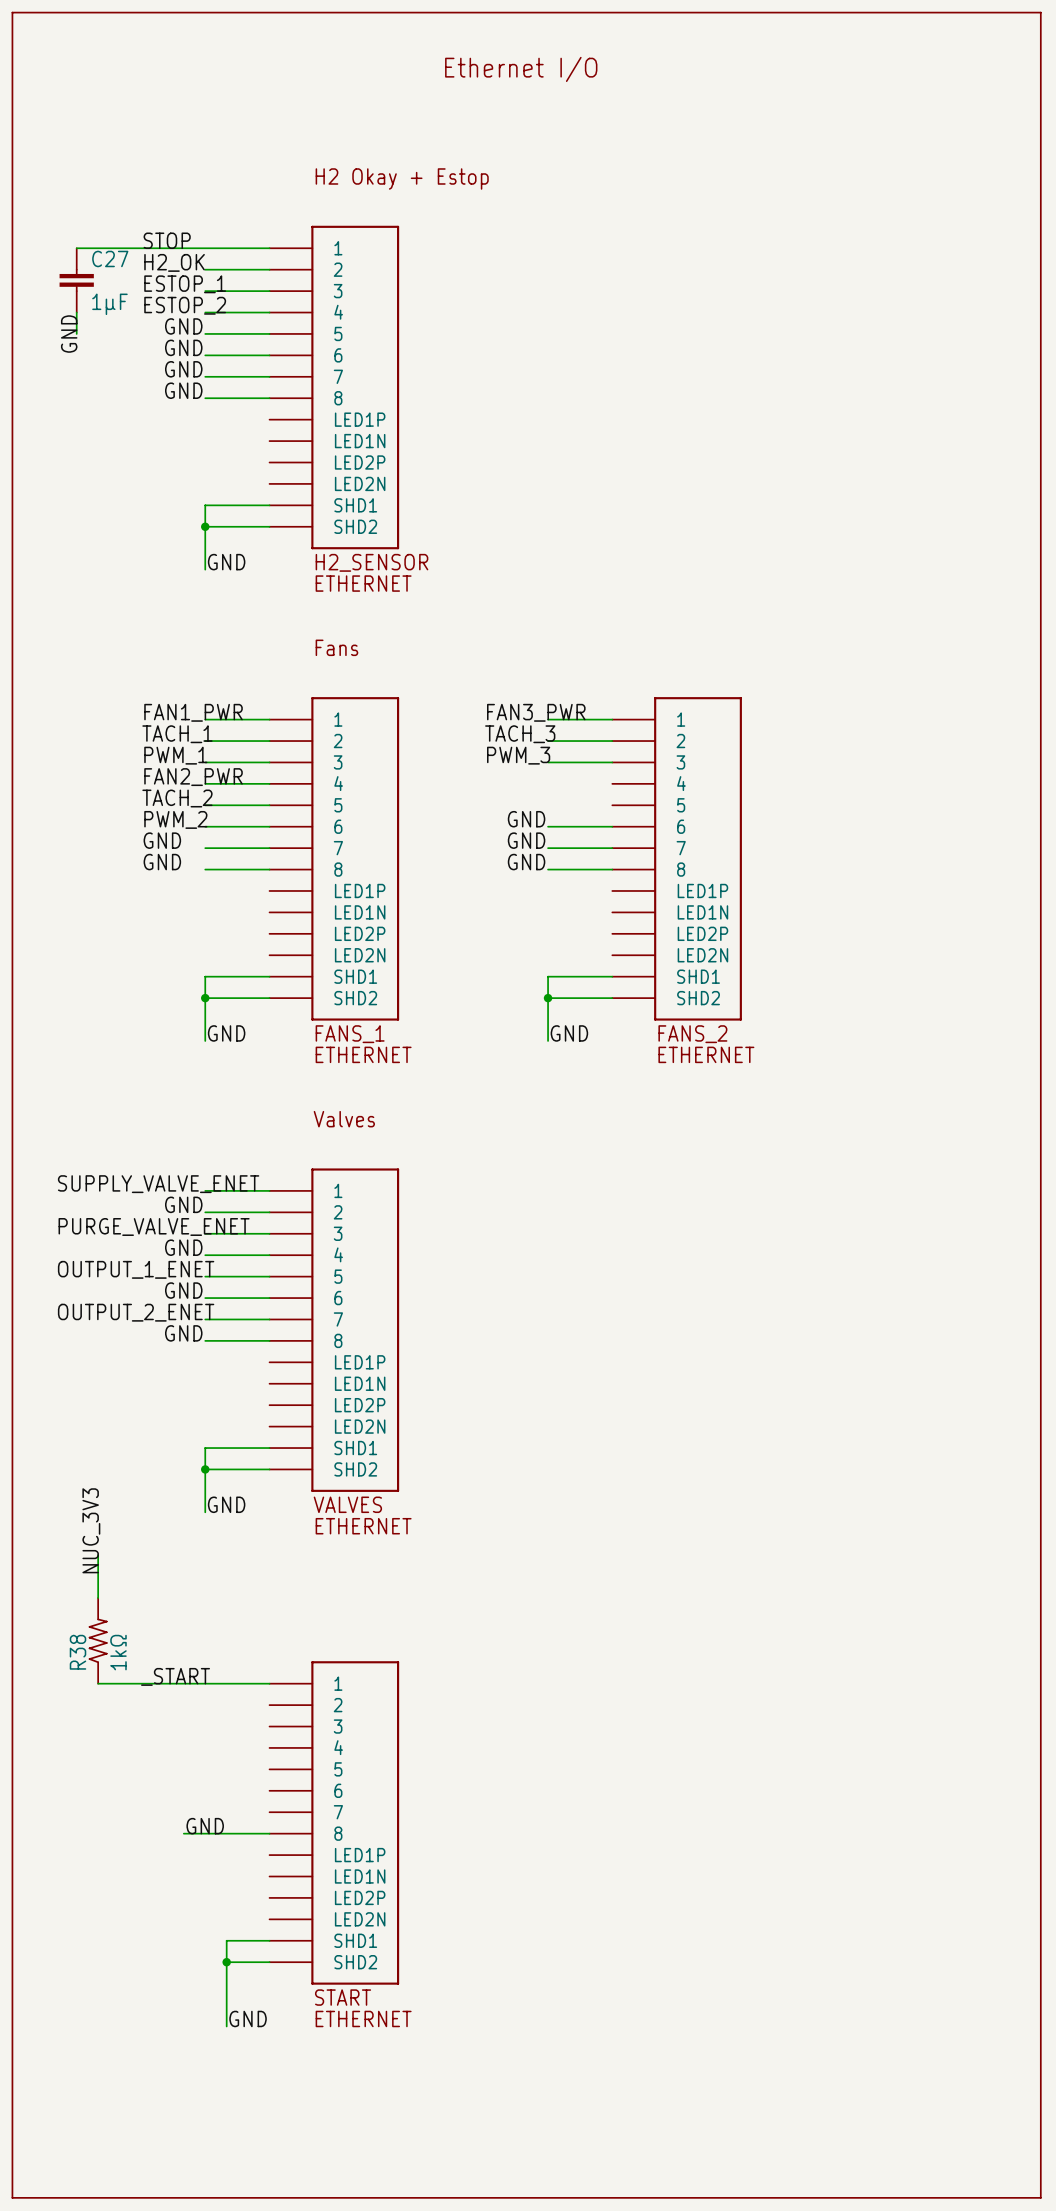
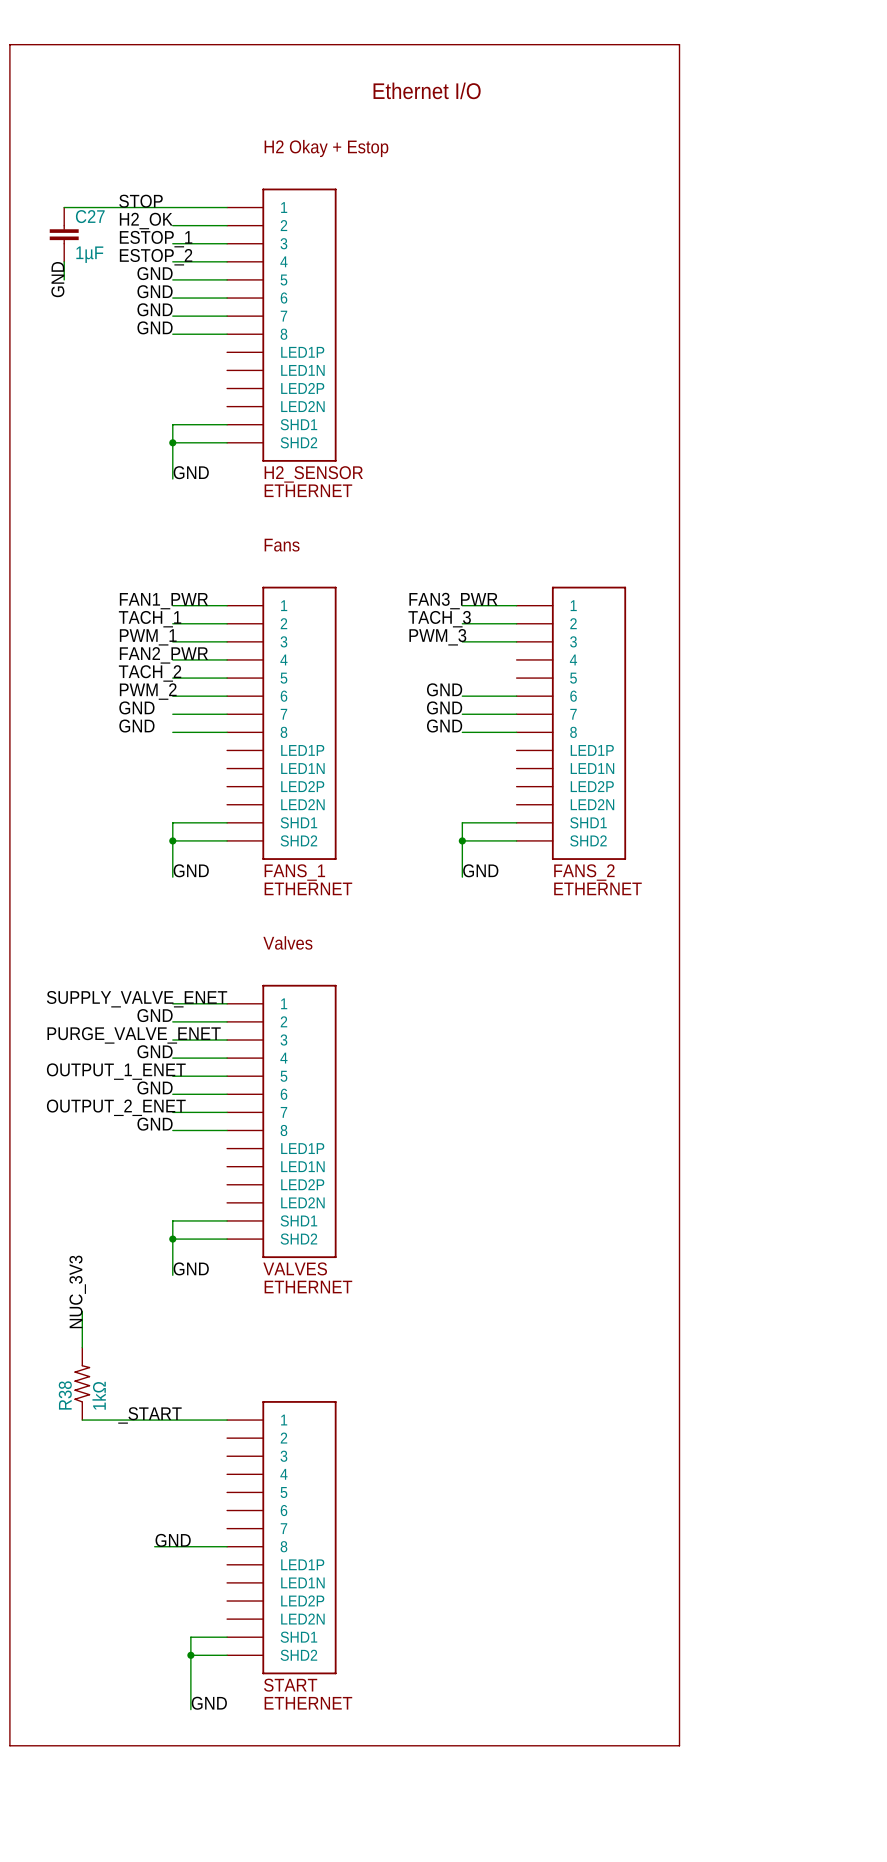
line: (12, 55) (12, 12) (1040, 12) (1040, 2197) (12, 2197) (12, 2069) -> (9, 44) (679, 44) (679, 1745) (9, 1745)
text position: Ethernet I/O (521, 69) -> Ethernet I/O (427, 90)

